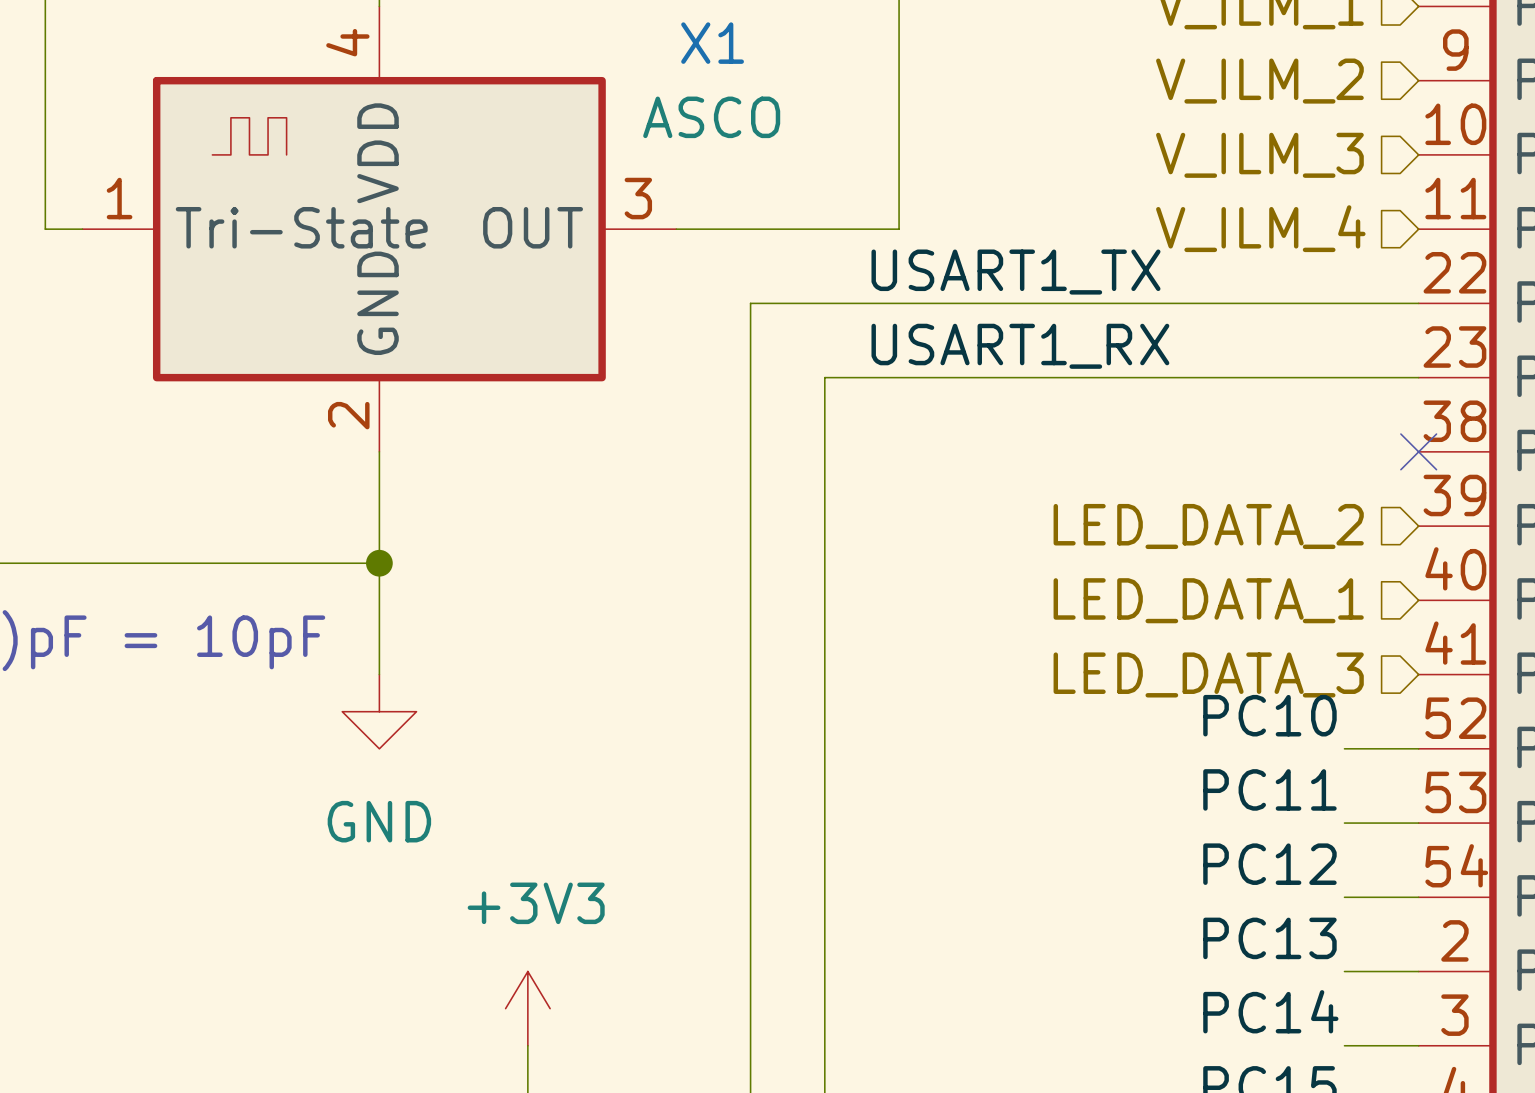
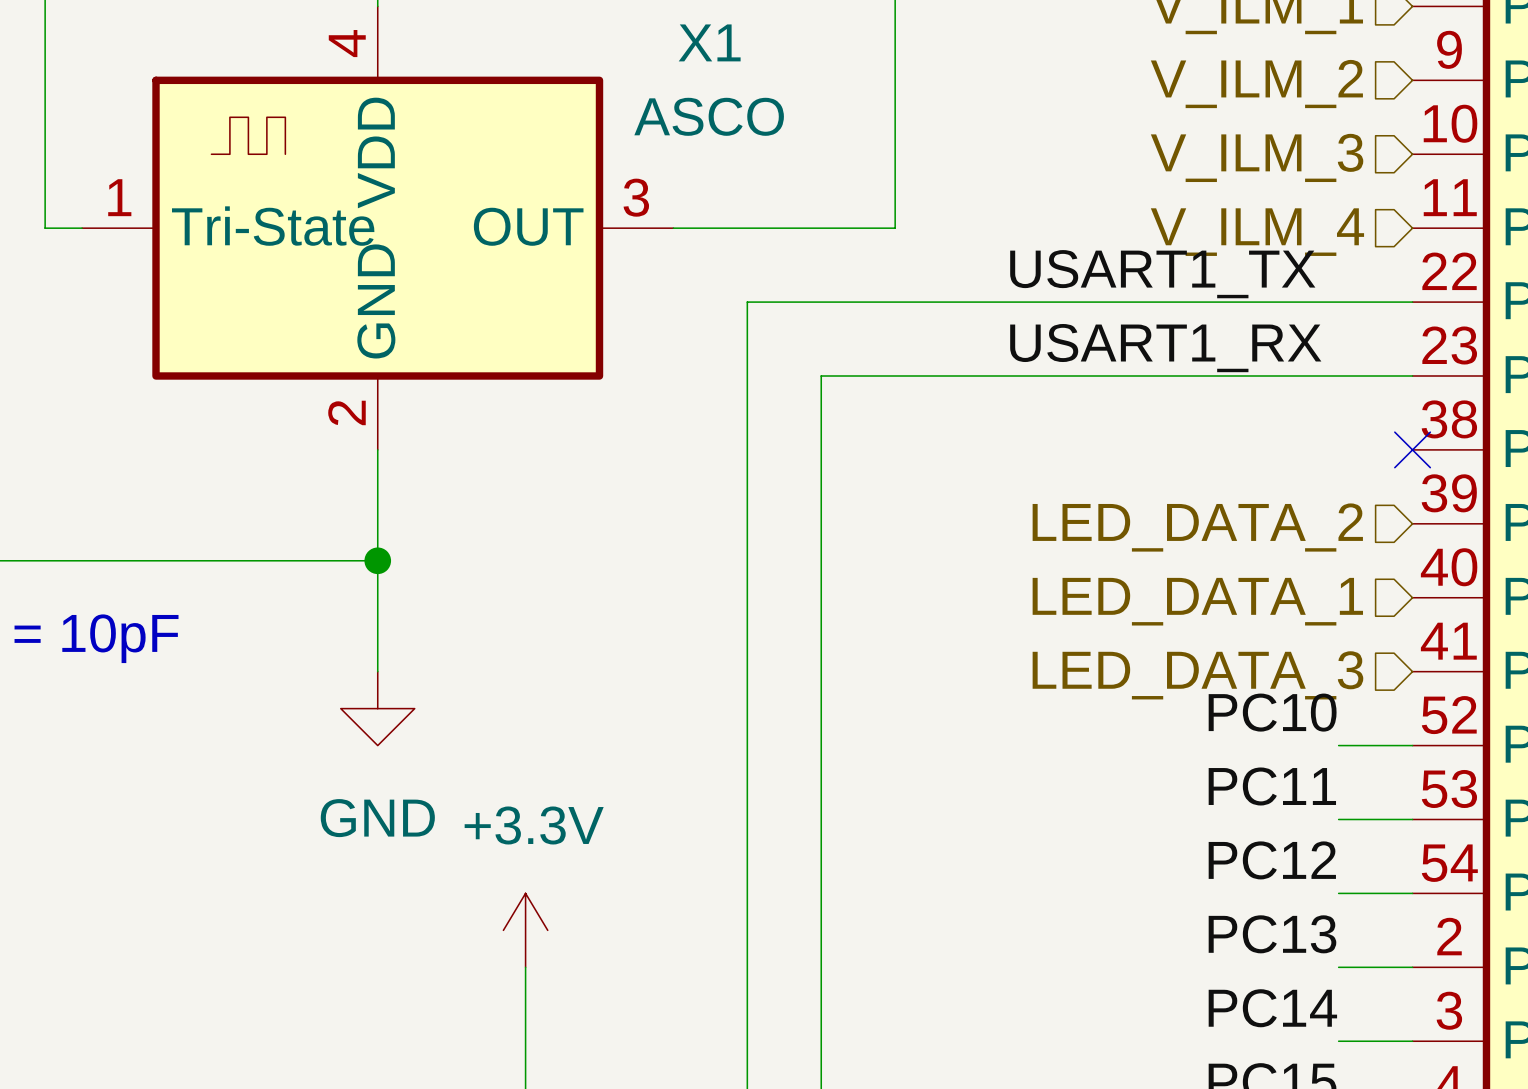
label position: USART1_TX (1015, 272) -> USART1_TX (1162, 274)
label position: USART1_RX (1020, 346) -> USART1_RX (1165, 348)
power symbol: none -> +3.3V (525, 930)
power symbol: +3V3 (527, 1008) -> none

